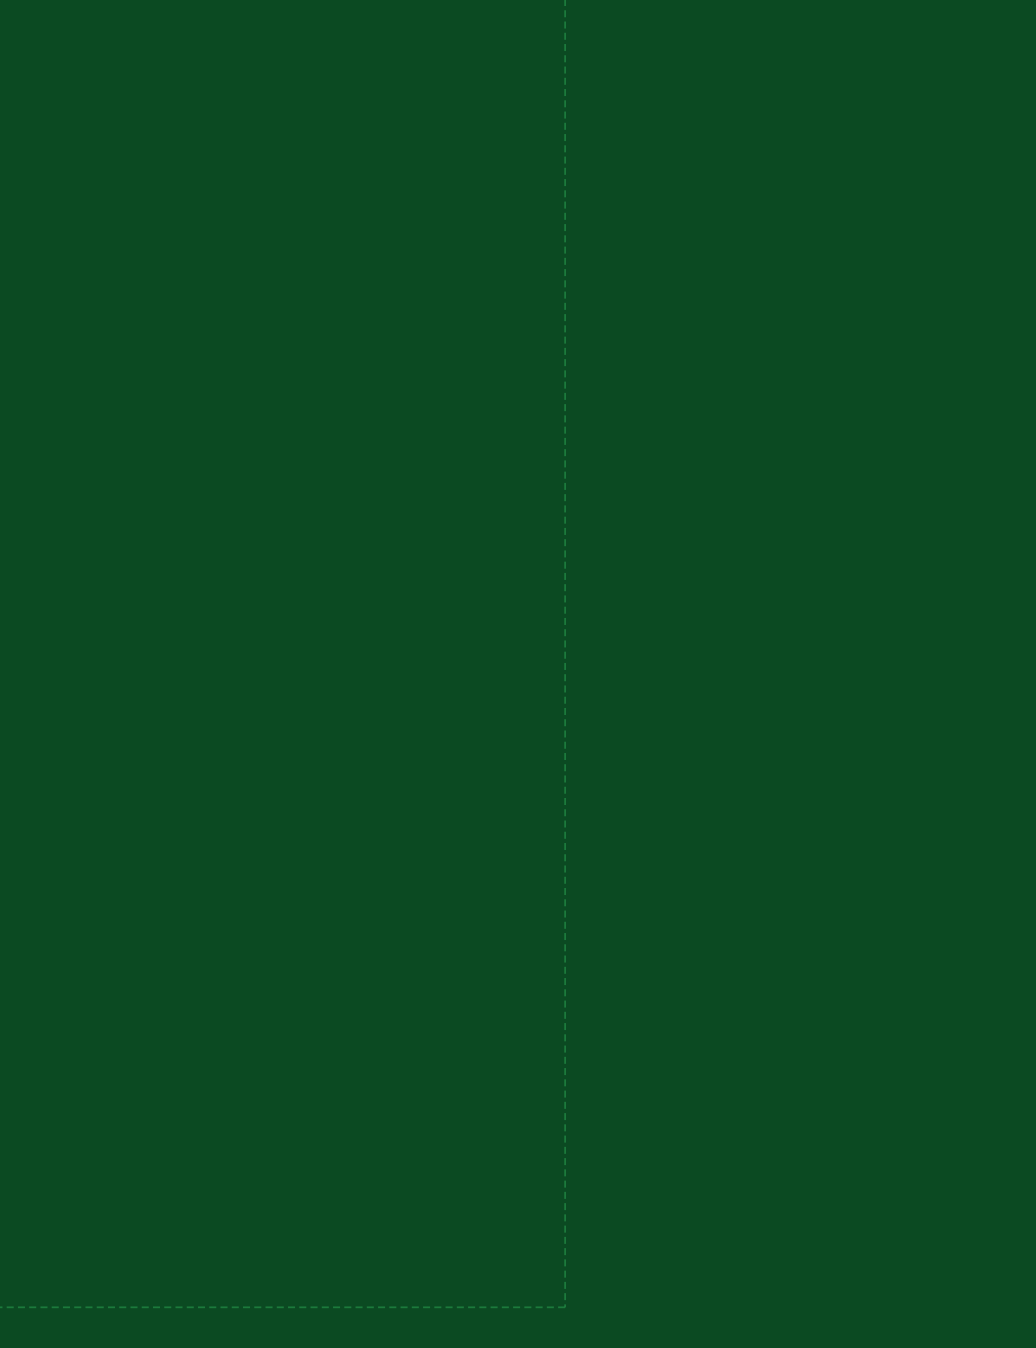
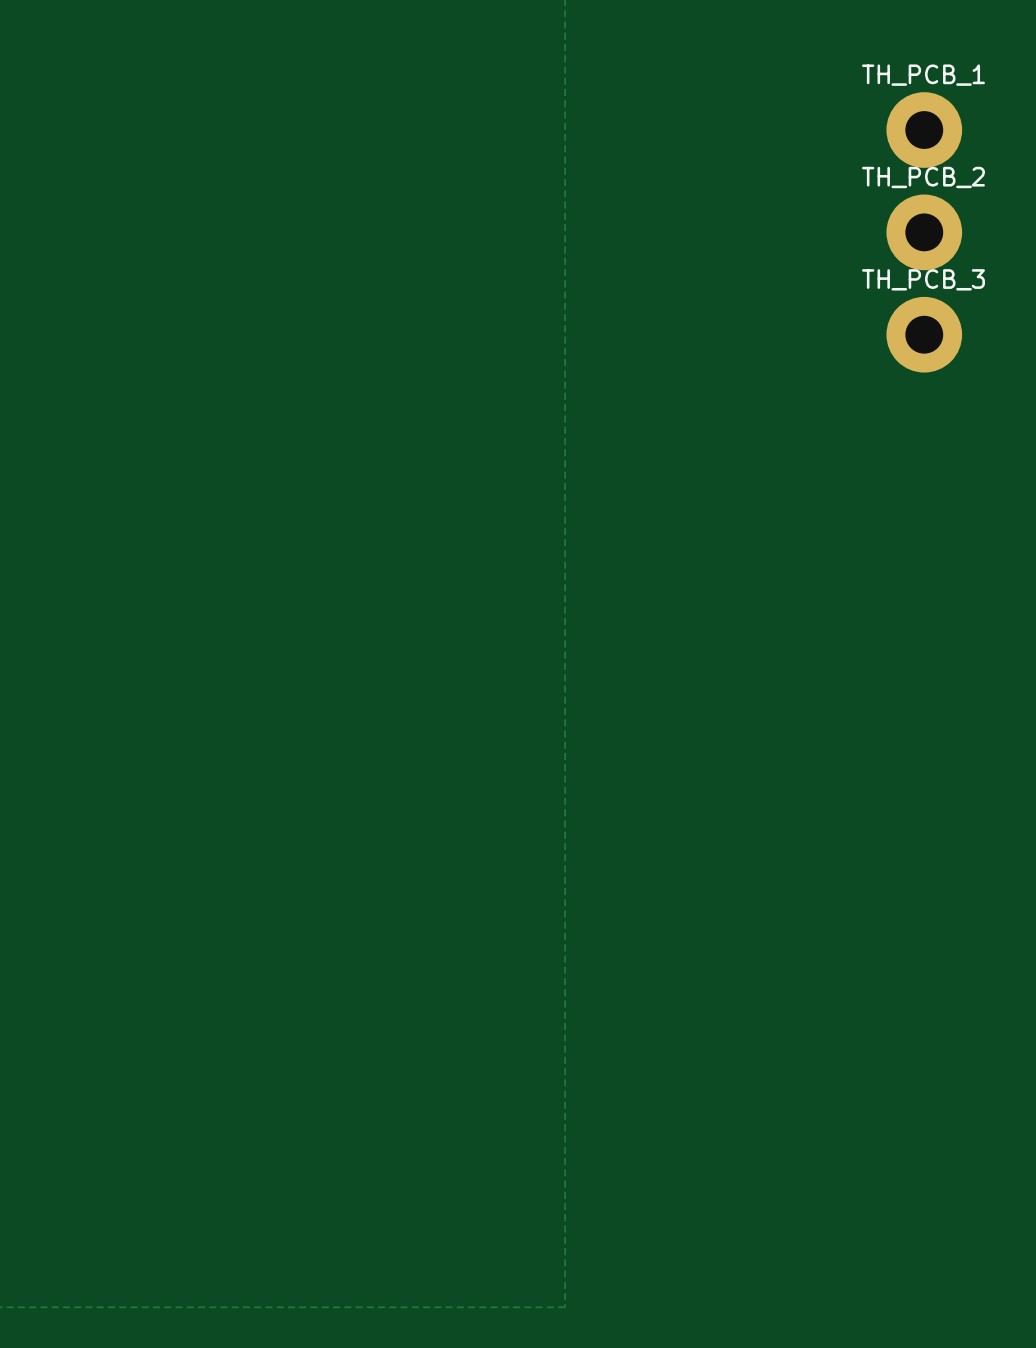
TH_PCB_1: none -> (924, 130)
TH_PCB_2: none -> (924, 232)
TH_PCB_3: none -> (924, 334)

